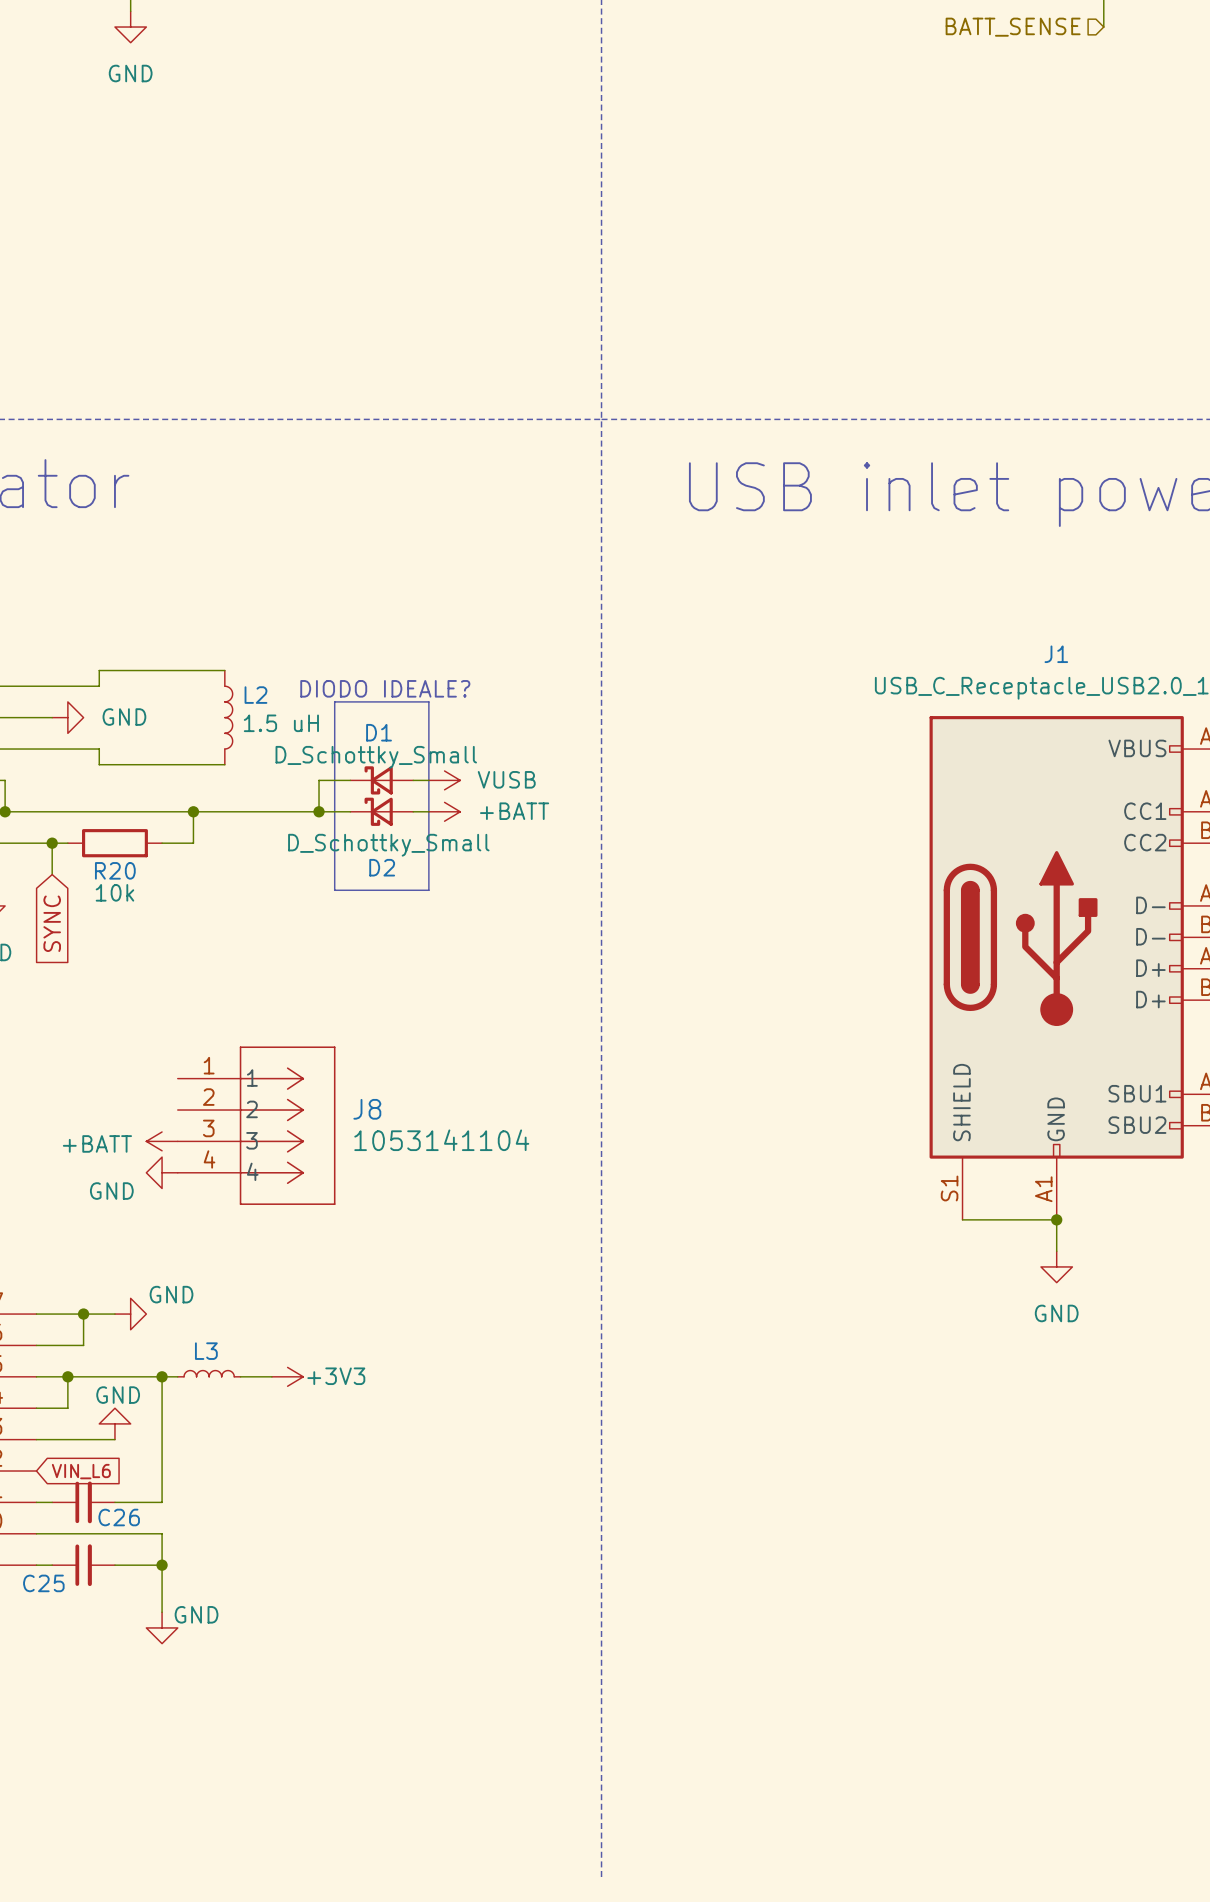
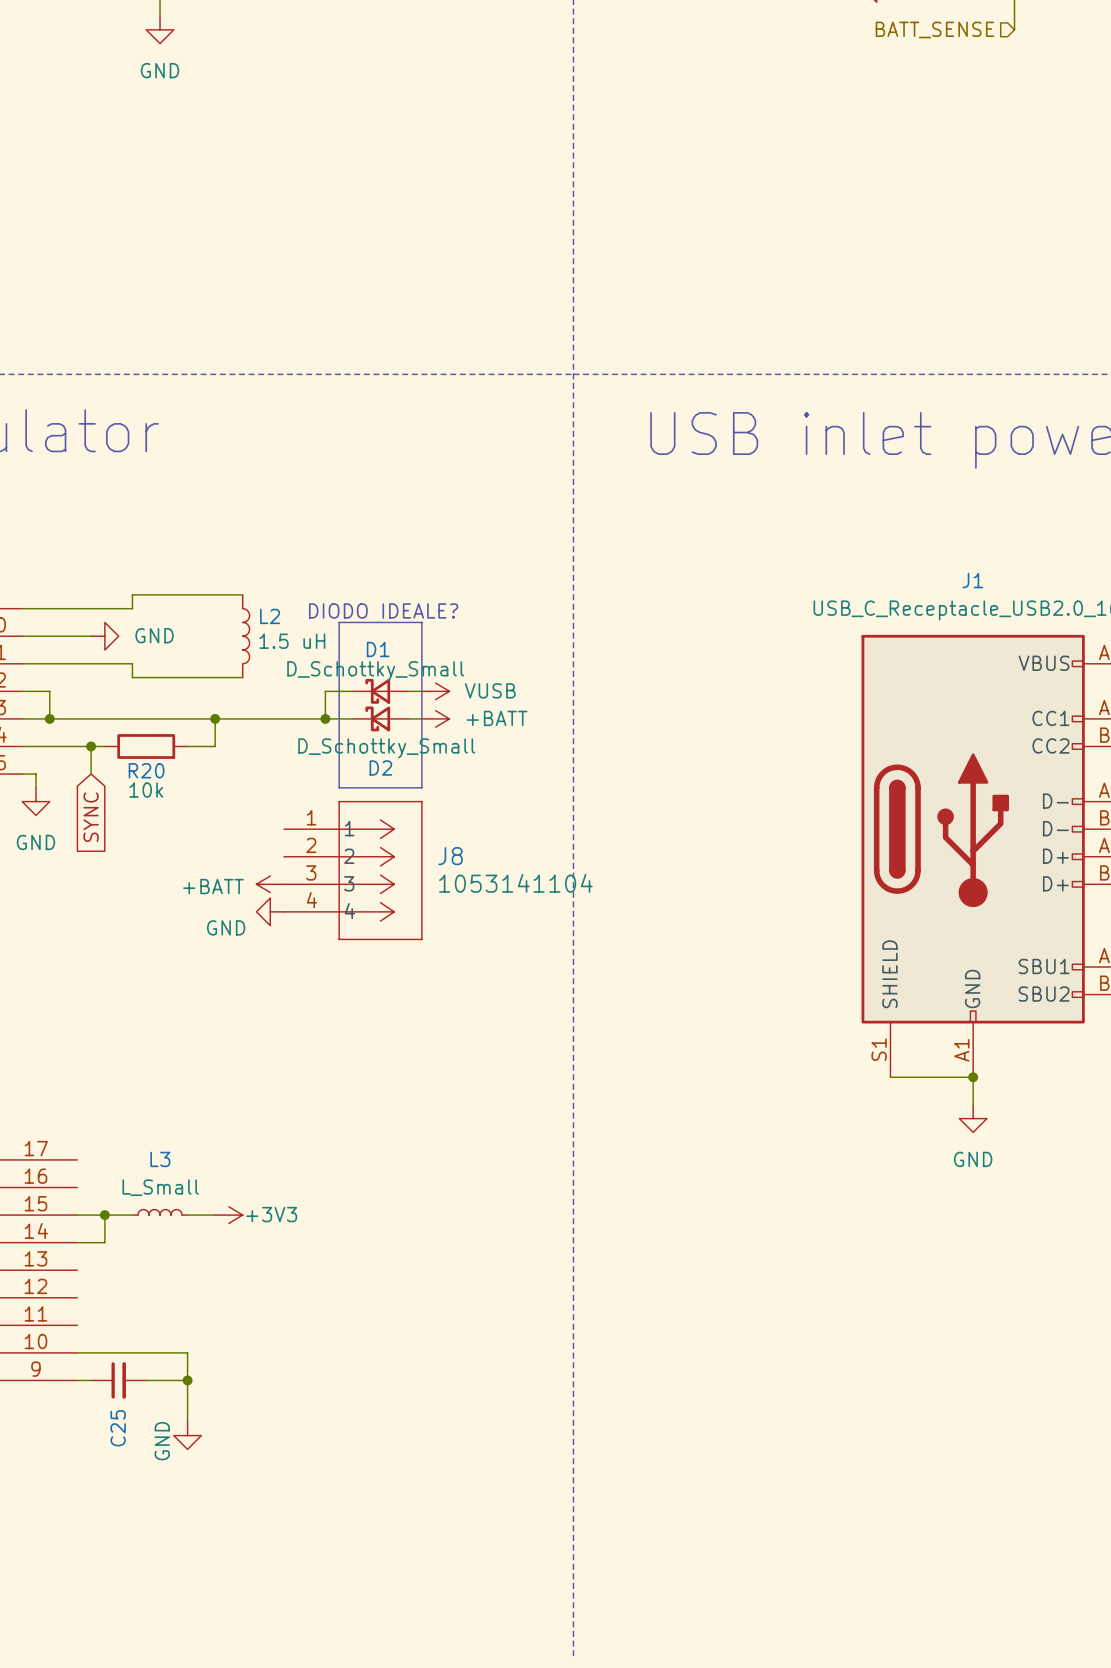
power symbol: none -> GND (270, 911)
J8 position: (256, 1125) -> (353, 870)
power symbol position: +BATT (162, 1141) -> +BATT (270, 884)
power symbol: GND (162, 1172) -> none
wire: (36, 1314) (114, 1314) -> none
wire: (83, 1314) (83, 1345) (36, 1345) -> none
junction: (83, 1314) -> none
power symbol: GND (130, 1314) -> none
L3 value: none -> L_Small (160, 1187)
L3 name position: L3 (206, 1351) -> L3 (160, 1159)
L3 position: (209, 1373) -> (160, 1212)
wire: (99, 1376) (162, 1376) (162, 1502) (114, 1502) -> none
junction: (162, 1376) -> none
wire: (240, 1376) (271, 1376) -> none
power symbol position: +3V3 (287, 1376) -> +3V3 (228, 1215)
power symbol: GND (114, 1423) -> none
wire: (36, 1439) (114, 1439) -> none
global label: VIN_L6 (81, 1471) -> none
wire: (36, 1502) (52, 1502) -> (201, 1215) (215, 1215)
C26: (83, 1502) -> none
C25 name rotation: 0° (43, 1583) -> 90° counterclockwise (118, 1428)
power symbol text rotation: 0° (196, 1614) -> 90° counterclockwise (162, 1441)
power symbol text position: GND (196, 1614) -> GND (162, 1441)

